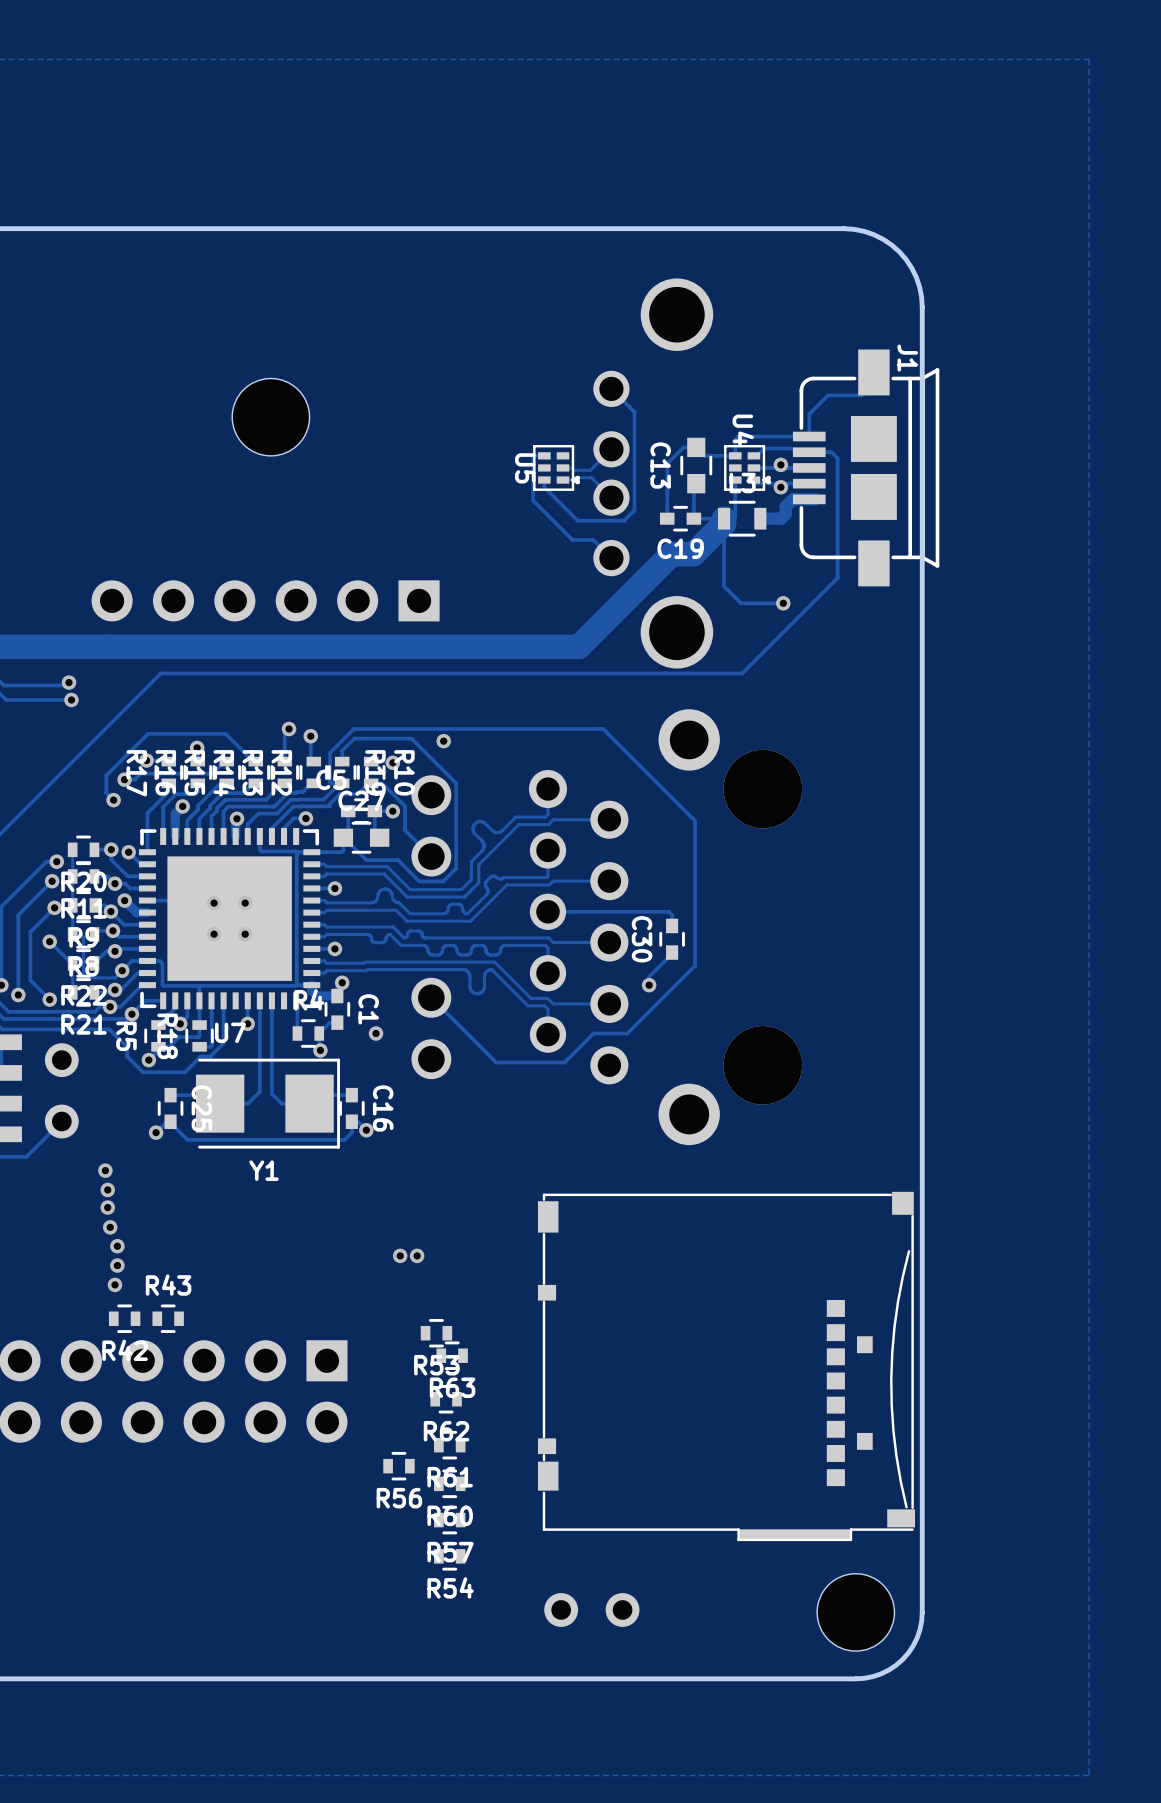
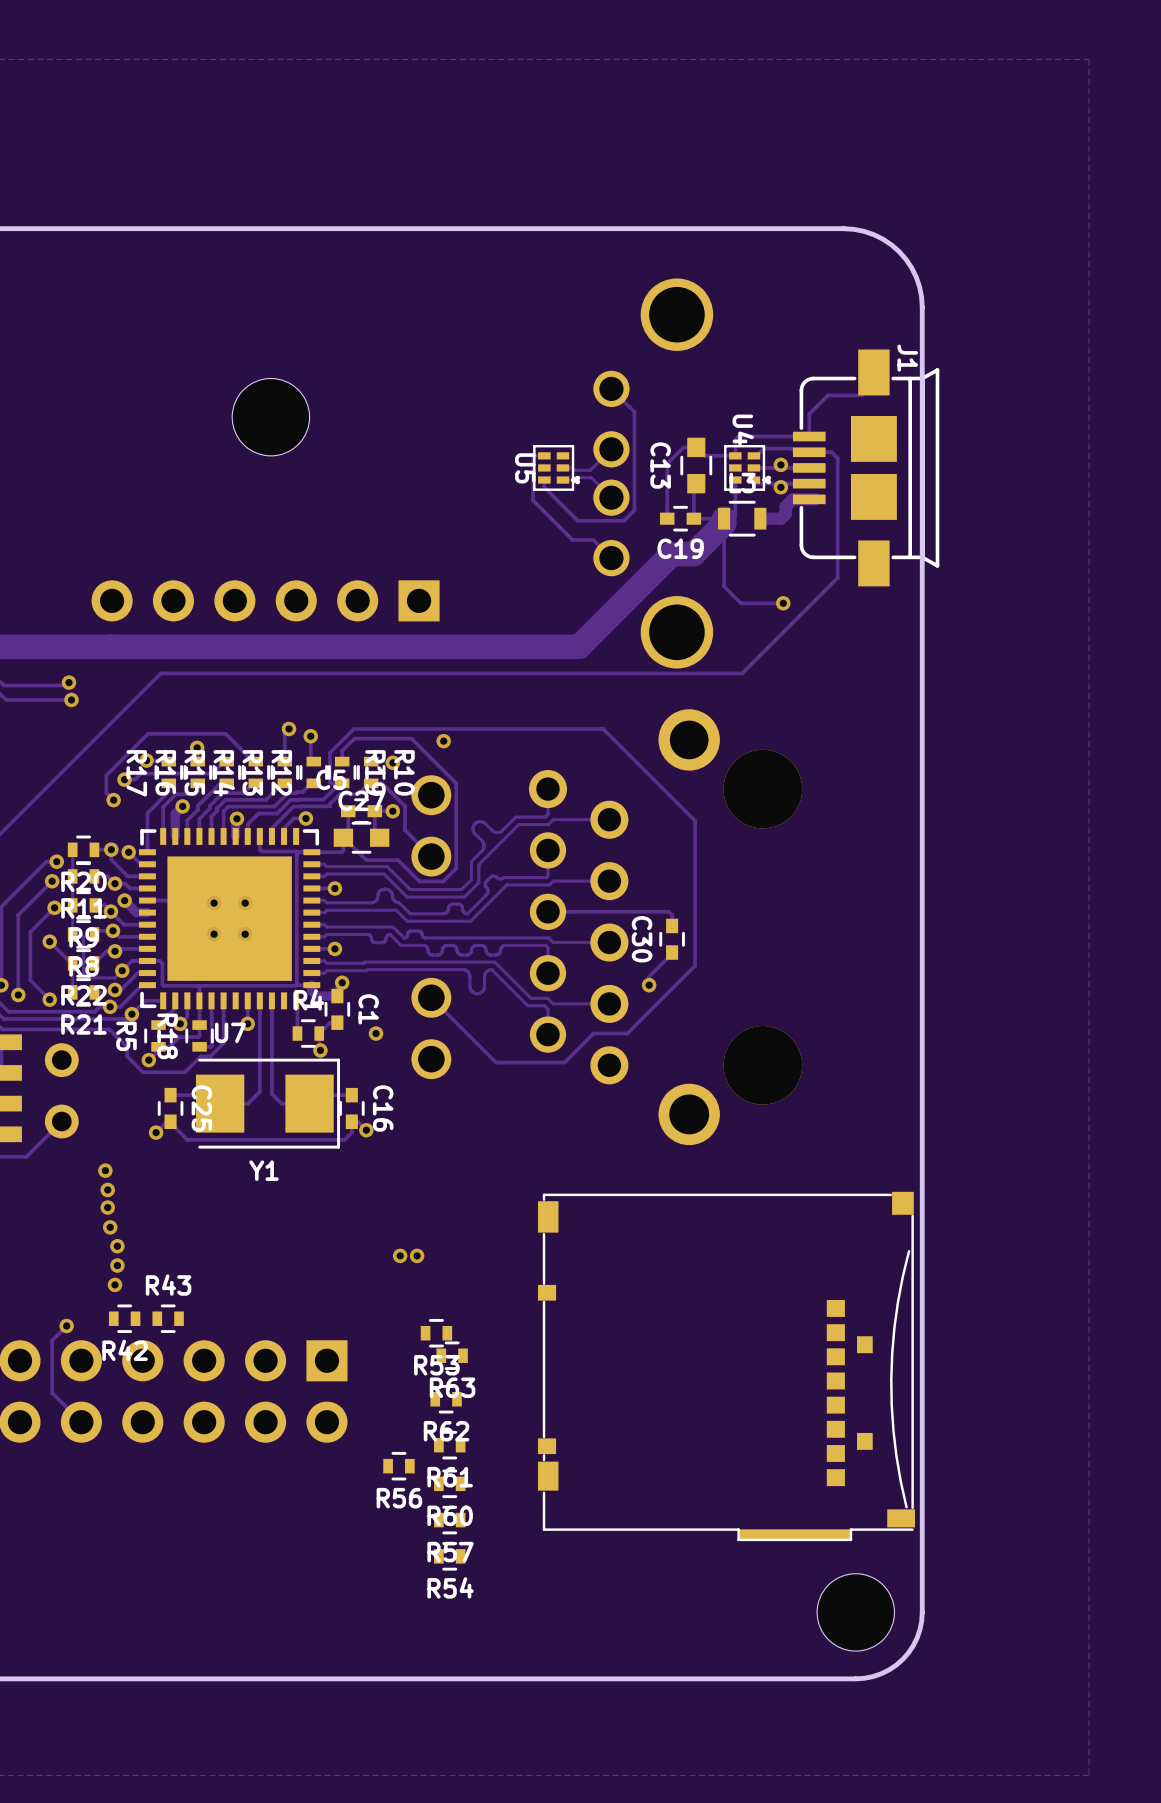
track: none -> (66, 1325) (52, 1340) (52, 1392) (81, 1422)
via: none -> (66, 1325)
part: (591, 1609) -> none

